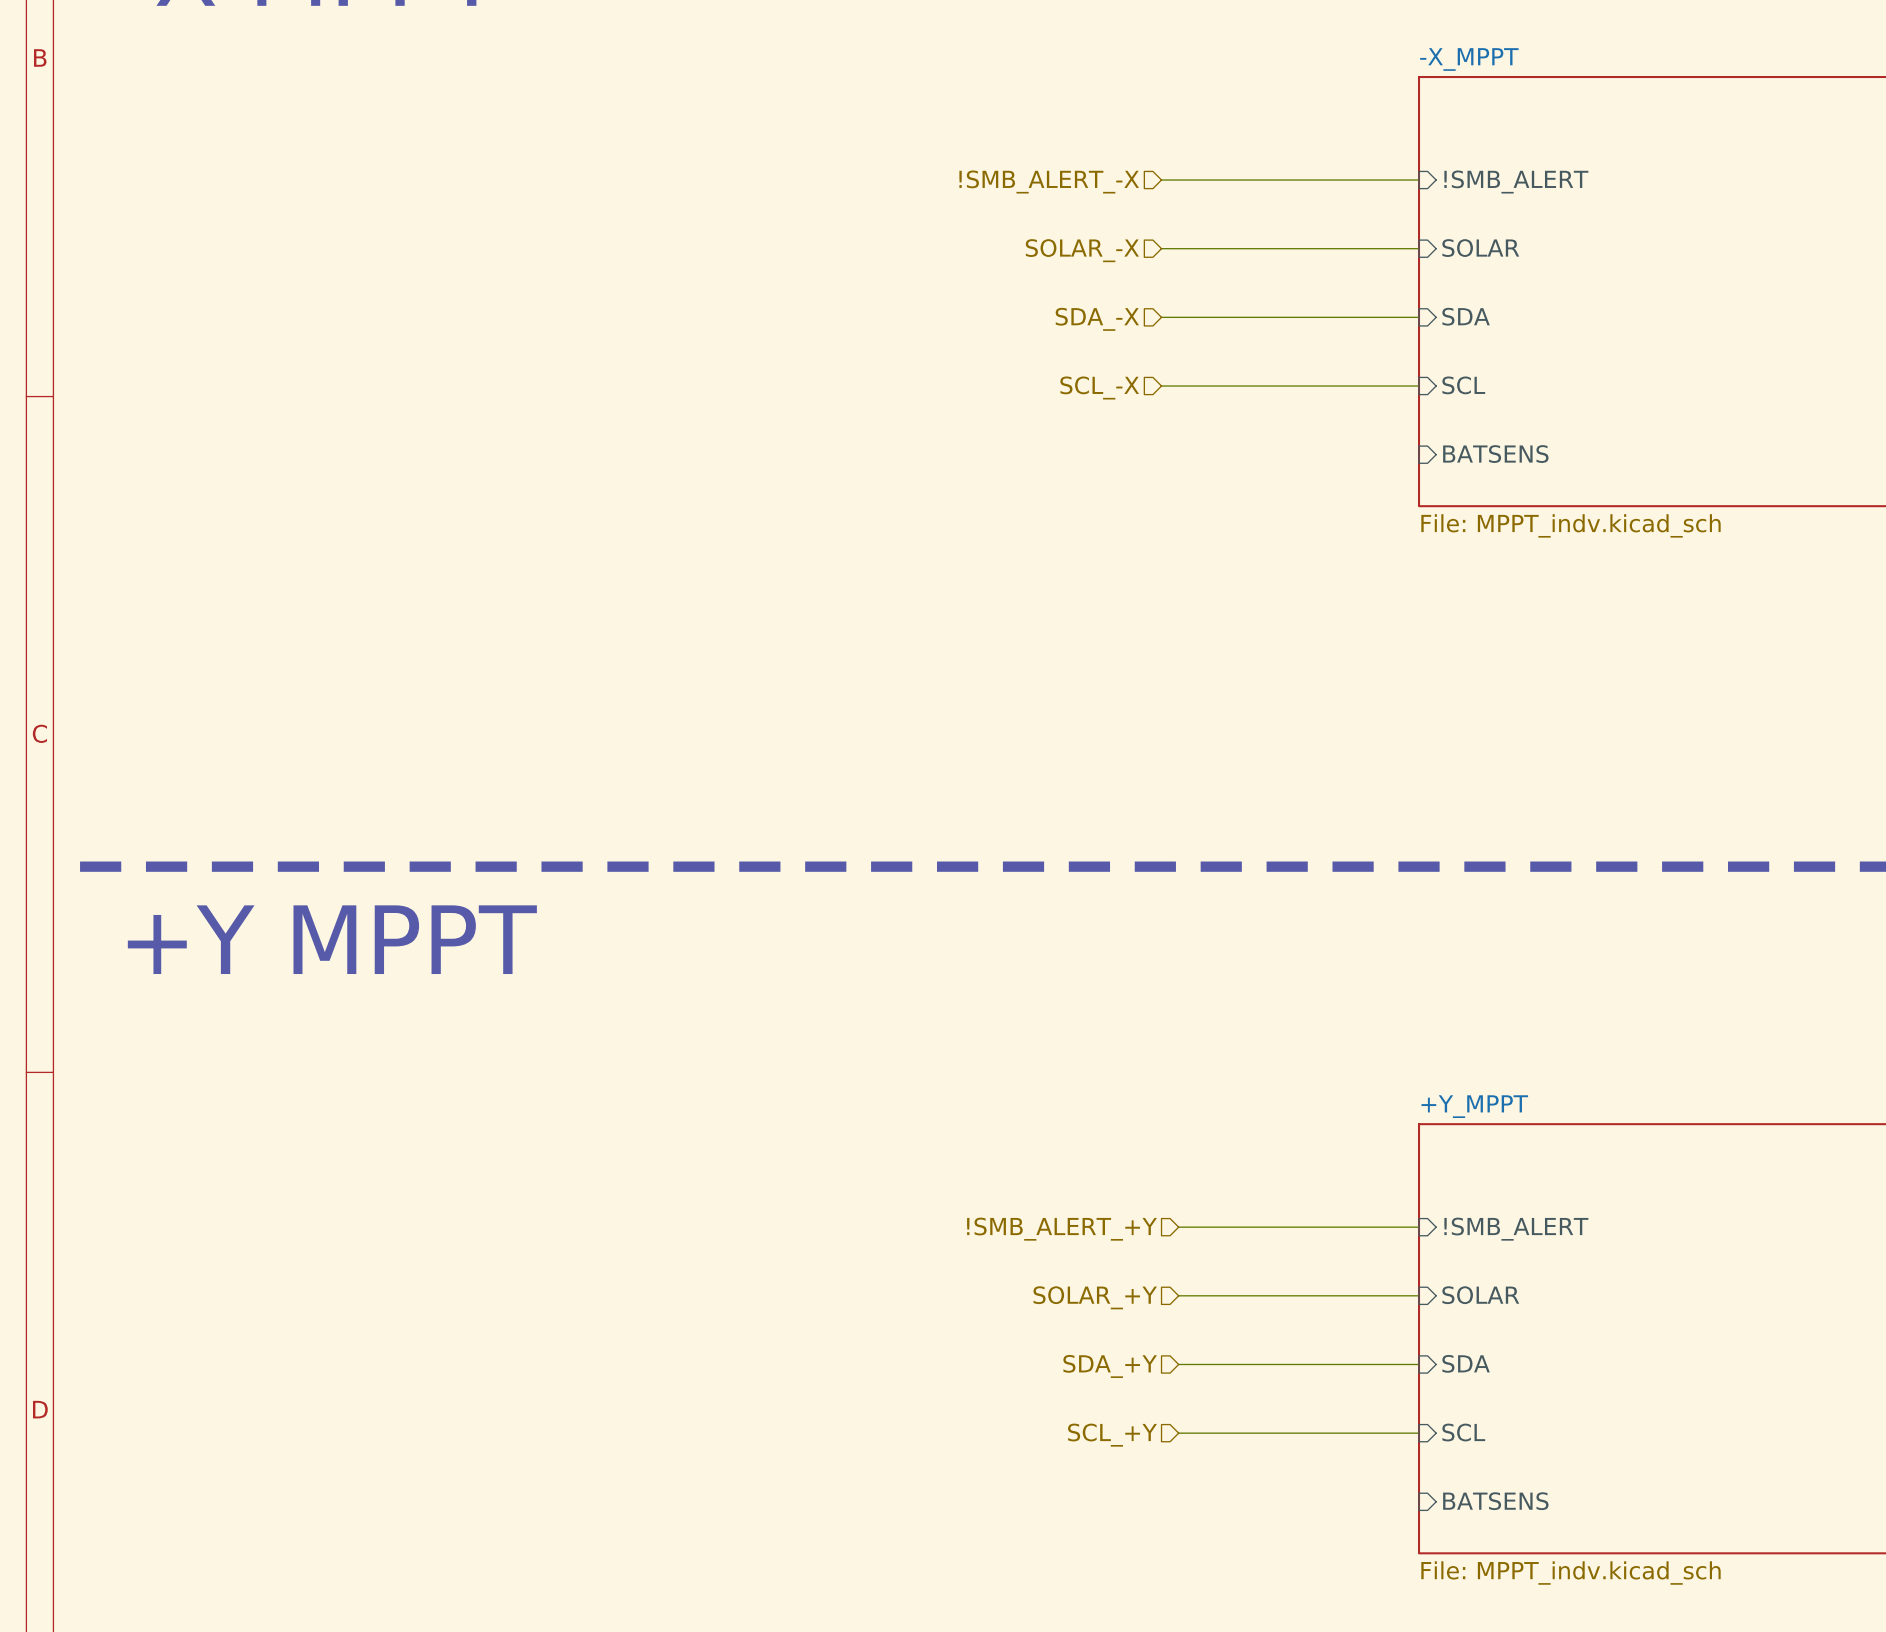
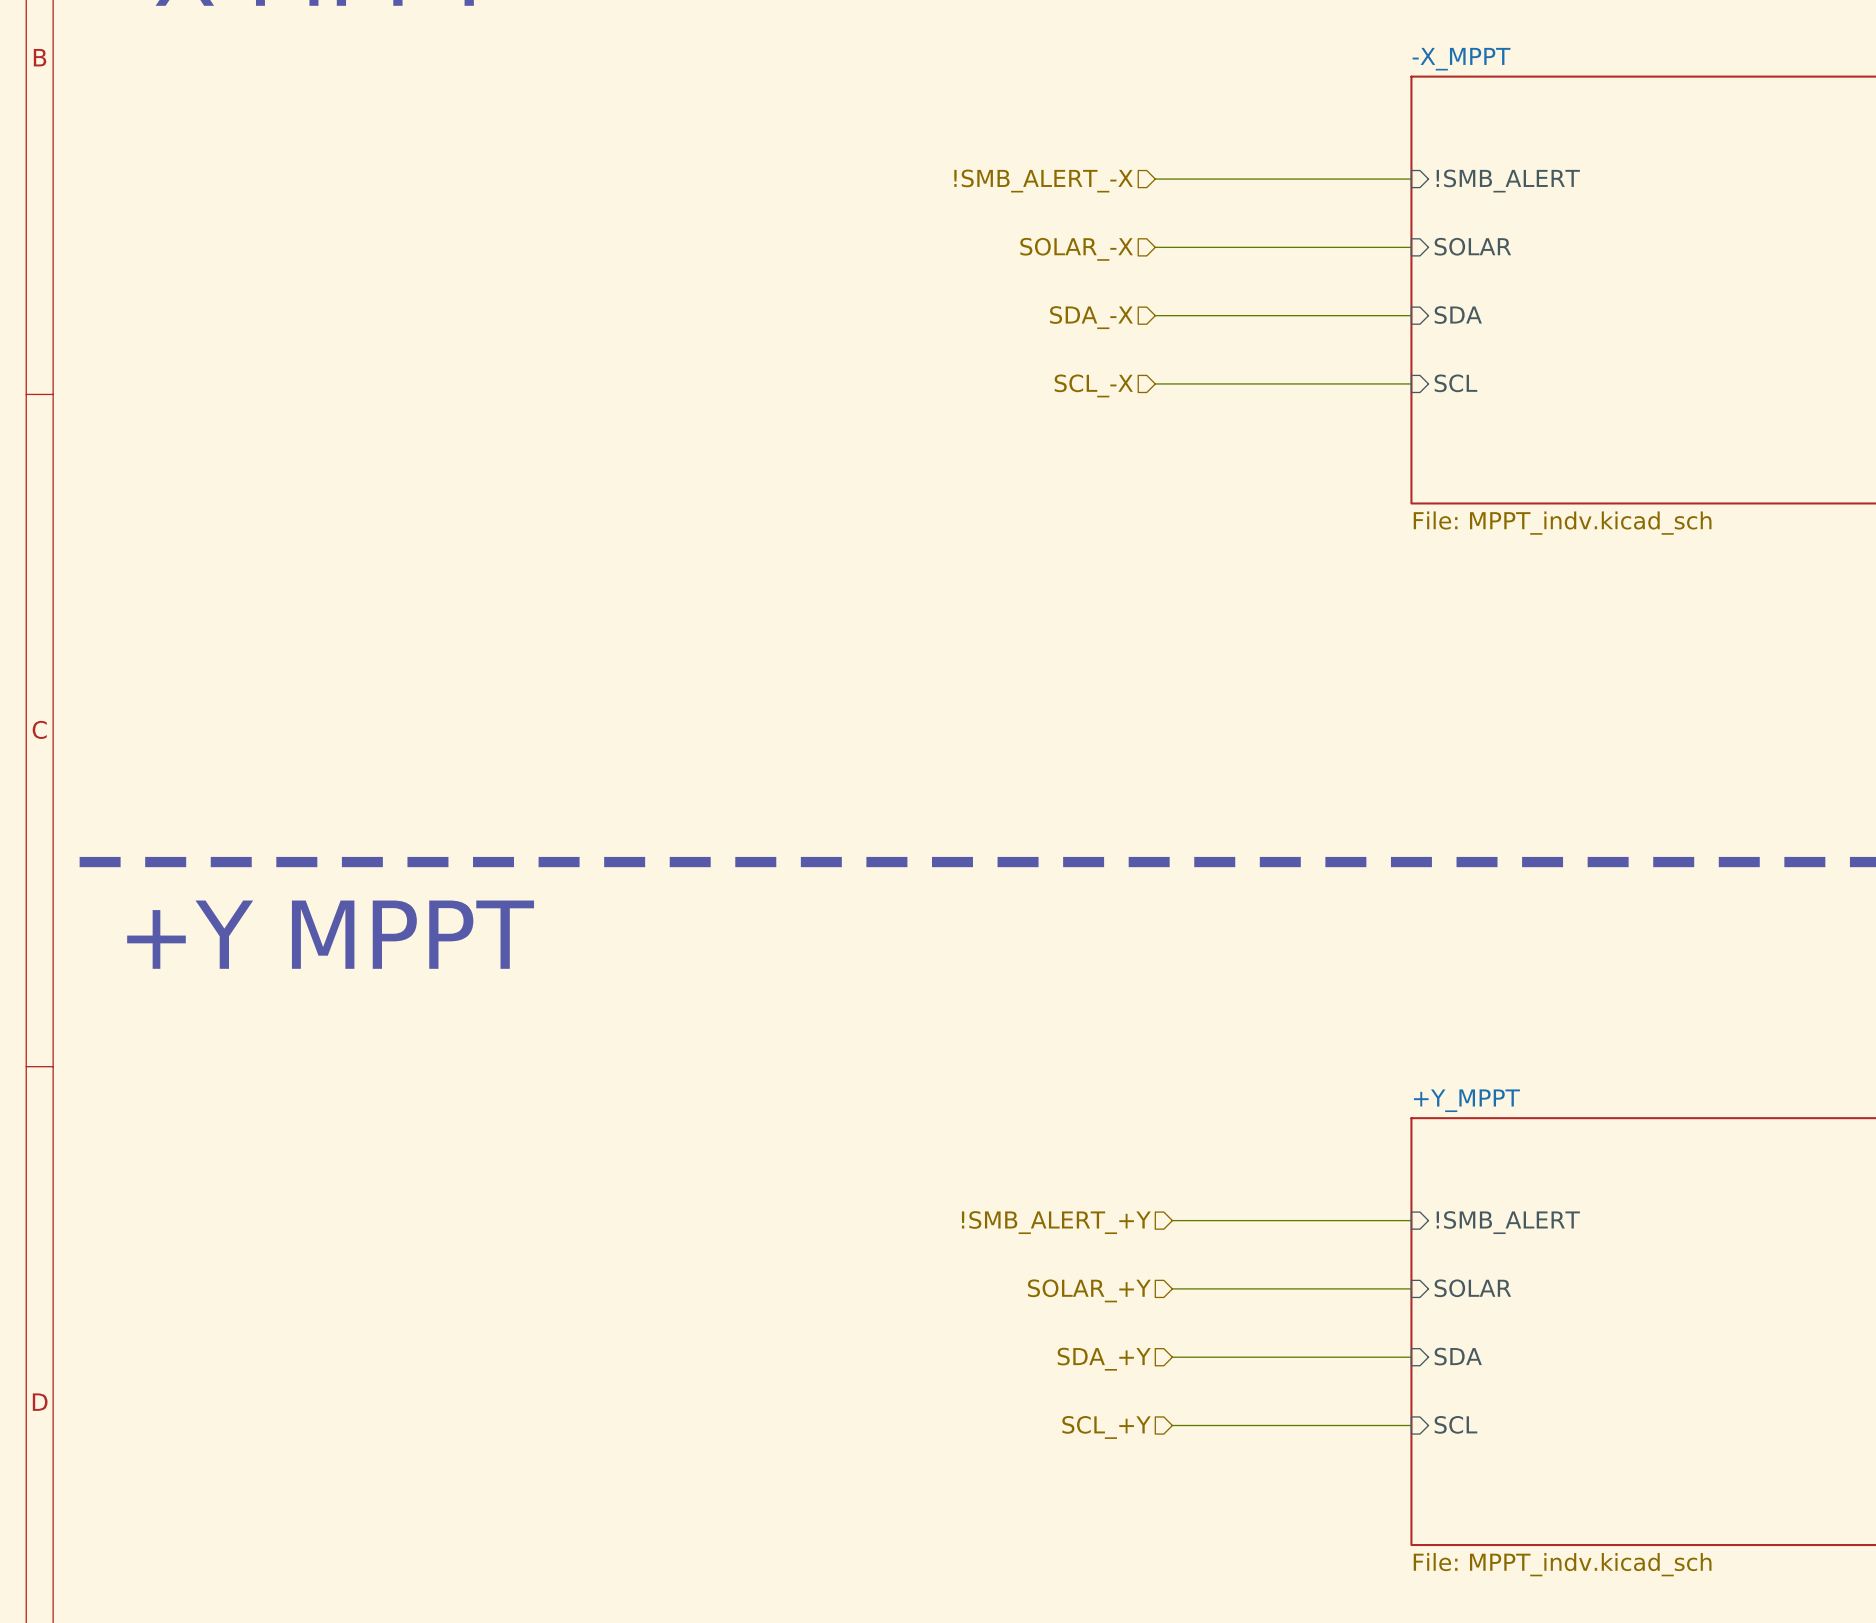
sheet pin: BATSENS (1495, 454) -> none
sheet pin: BATSENS (1495, 1501) -> none

